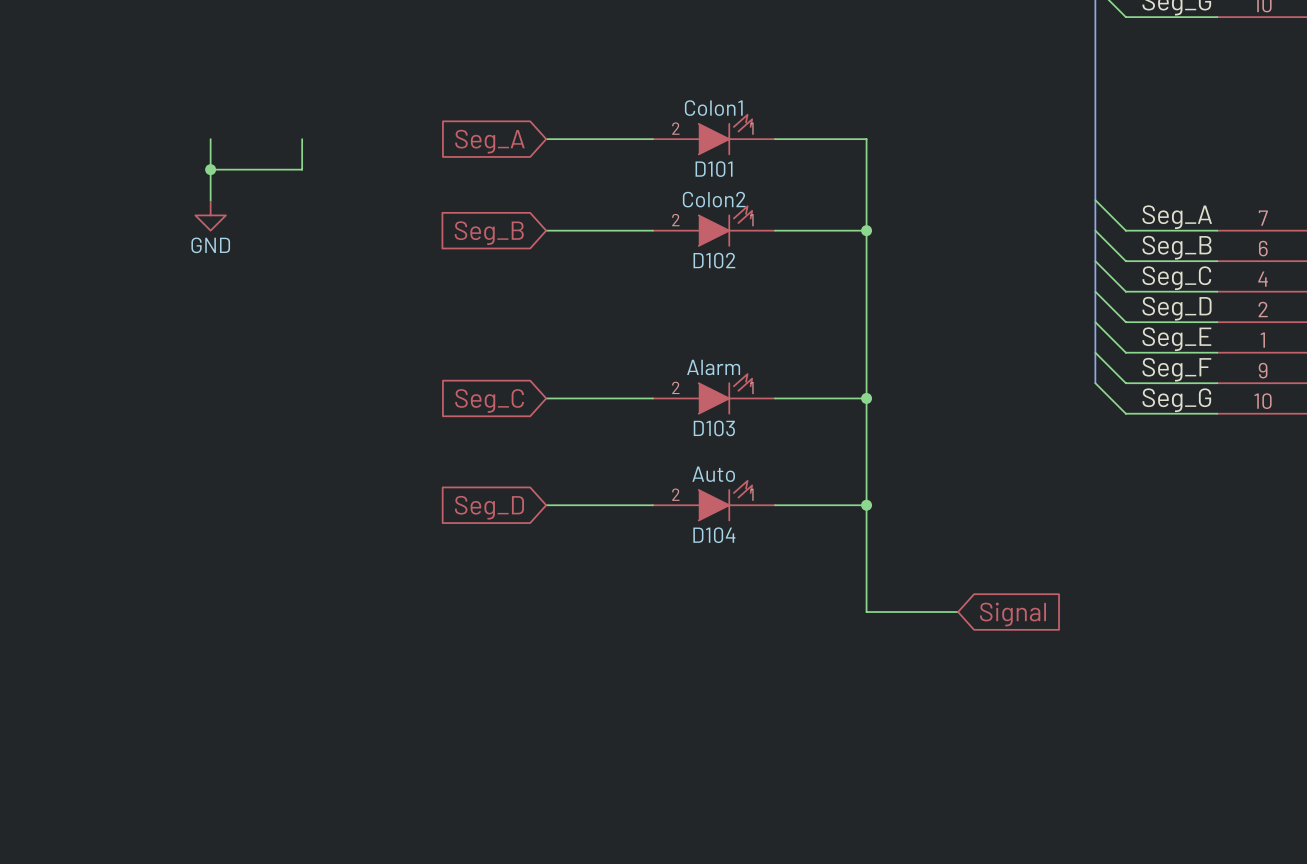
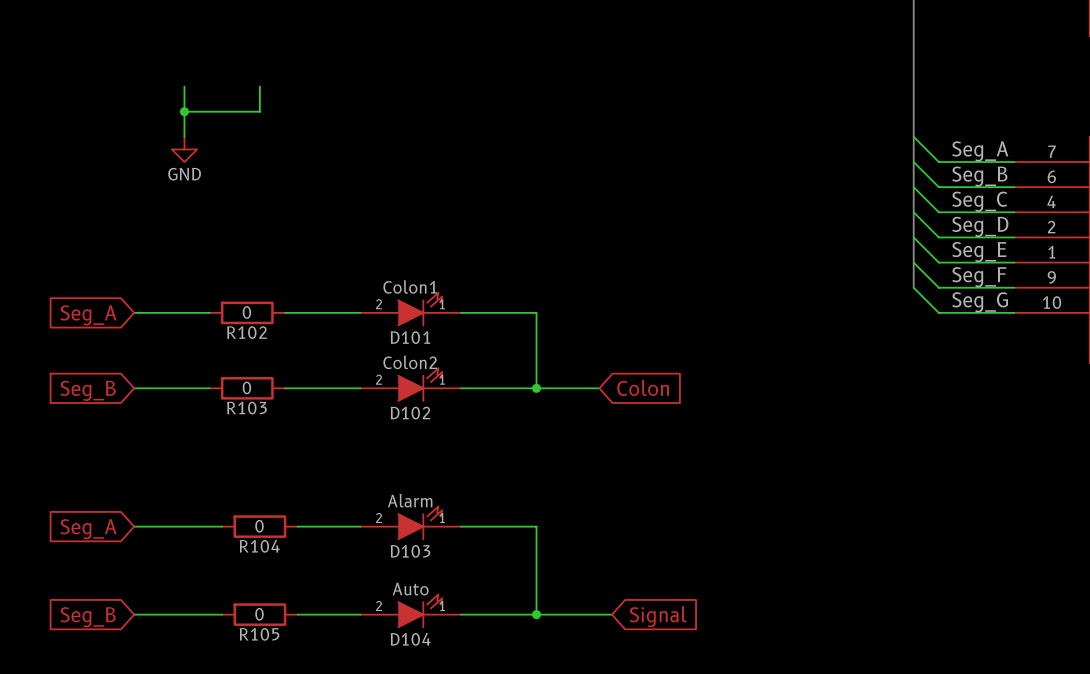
D101 position: (714, 134) -> (410, 309)
wire: (546, 139) (653, 139) -> none
wire: (775, 139) (866, 139) (866, 612) (958, 612) -> none
global label: Seg_A (489, 141) -> none
D102 position: (714, 226) -> (410, 384)
wire: (546, 230) (653, 230) -> none
wire: (775, 230) (866, 230) -> none
junction: (866, 230) -> none
global label: Seg_B (489, 233) -> none
D103 position: (714, 393) -> (410, 522)
wire: (546, 398) (653, 398) -> none
wire: (775, 398) (866, 398) -> none
junction: (866, 398) -> none
global label: Seg_C (489, 400) -> none
wire: none -> (134, 312) (209, 312)
R102: none -> 0 (247, 312)
wire: none -> (285, 312) (360, 312)
wire: none -> (461, 312) (536, 312) (536, 388)
global label: none -> Seg_A (88, 315)
D104 position: (714, 500) -> (410, 610)
wire: none -> (134, 388) (209, 388)
R103: none -> 0 (247, 388)
wire: none -> (285, 388) (360, 388)
junction: none -> (536, 388)
global label: none -> Colon (643, 387)
wire: (775, 505) (866, 505) -> none
junction: (866, 505) -> none
global label: none -> Seg_B (88, 390)
global label: Seg_D (489, 507) -> none
global label position: Signal (1013, 614) -> Signal (658, 616)
wire: none -> (134, 526) (222, 526)
R104: none -> 0 (259, 526)
wire: none -> (297, 526) (360, 526)
wire: none -> (461, 526) (536, 526) (536, 614)
global label: none -> Seg_A (88, 529)
wire: none -> (134, 614) (222, 614)
R105: none -> 0 (259, 614)
wire: none -> (297, 614) (360, 614)
wire: none -> (461, 614) (611, 614)
junction: none -> (536, 614)
global label: none -> Seg_B (88, 617)

